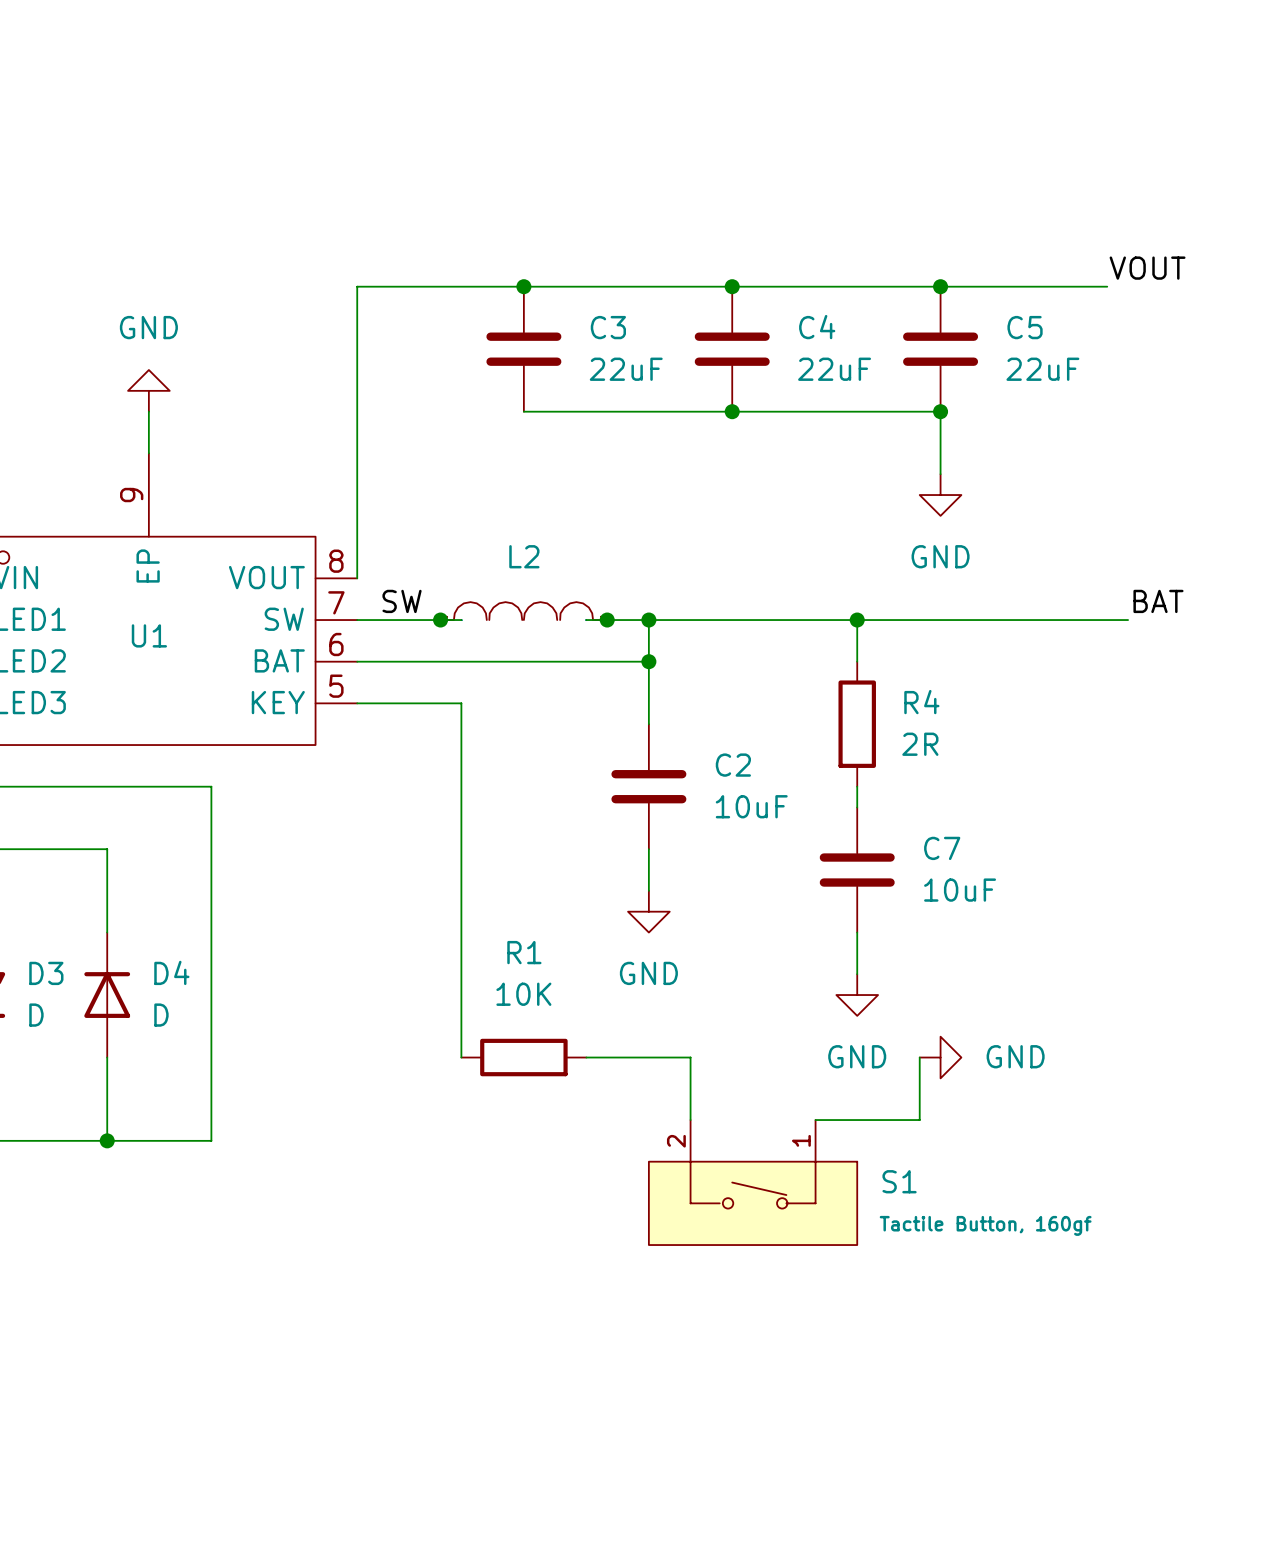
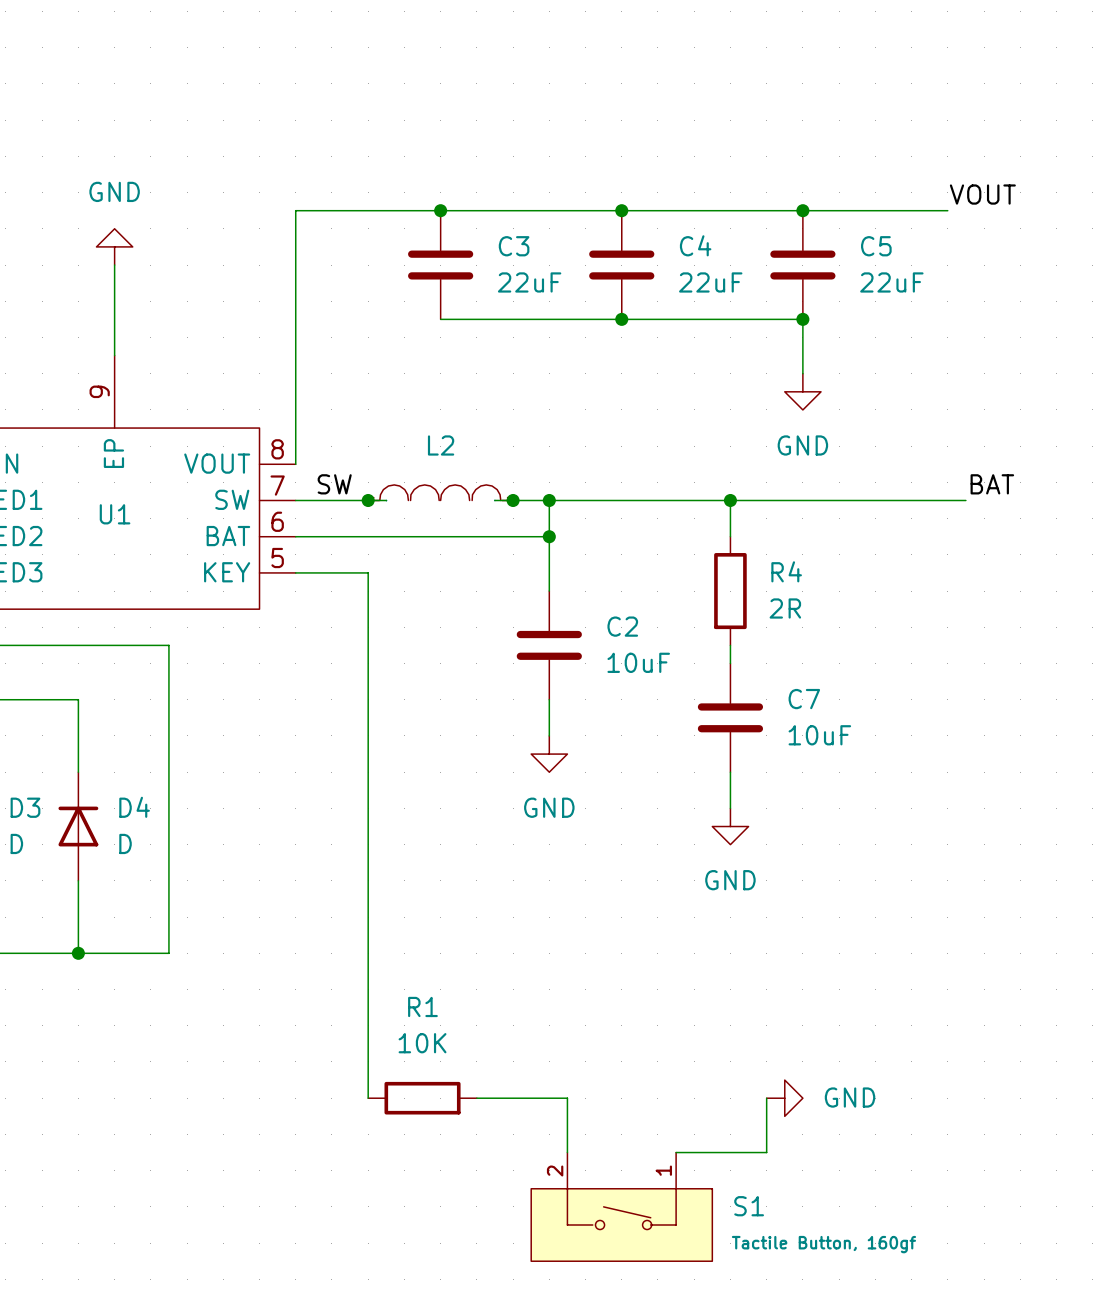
wire: none -> (114, 265) (114, 319)
power symbol position: GND (148, 390) -> GND (114, 246)
wire: (440, 703) (461, 703) (461, 1057) -> (368, 572) (368, 1098)
R1 position: (523, 1057) -> (422, 1098)
wire: (586, 1057) (690, 1057) (690, 1120) -> (476, 1098) (567, 1098) (567, 1152)
wire: (919, 1057) (919, 1120) (815, 1120) -> (766, 1098) (766, 1152) (676, 1152)
power symbol position: GND (940, 1057) -> GND (784, 1098)
S1 position: (753, 1182) -> (621, 1206)

